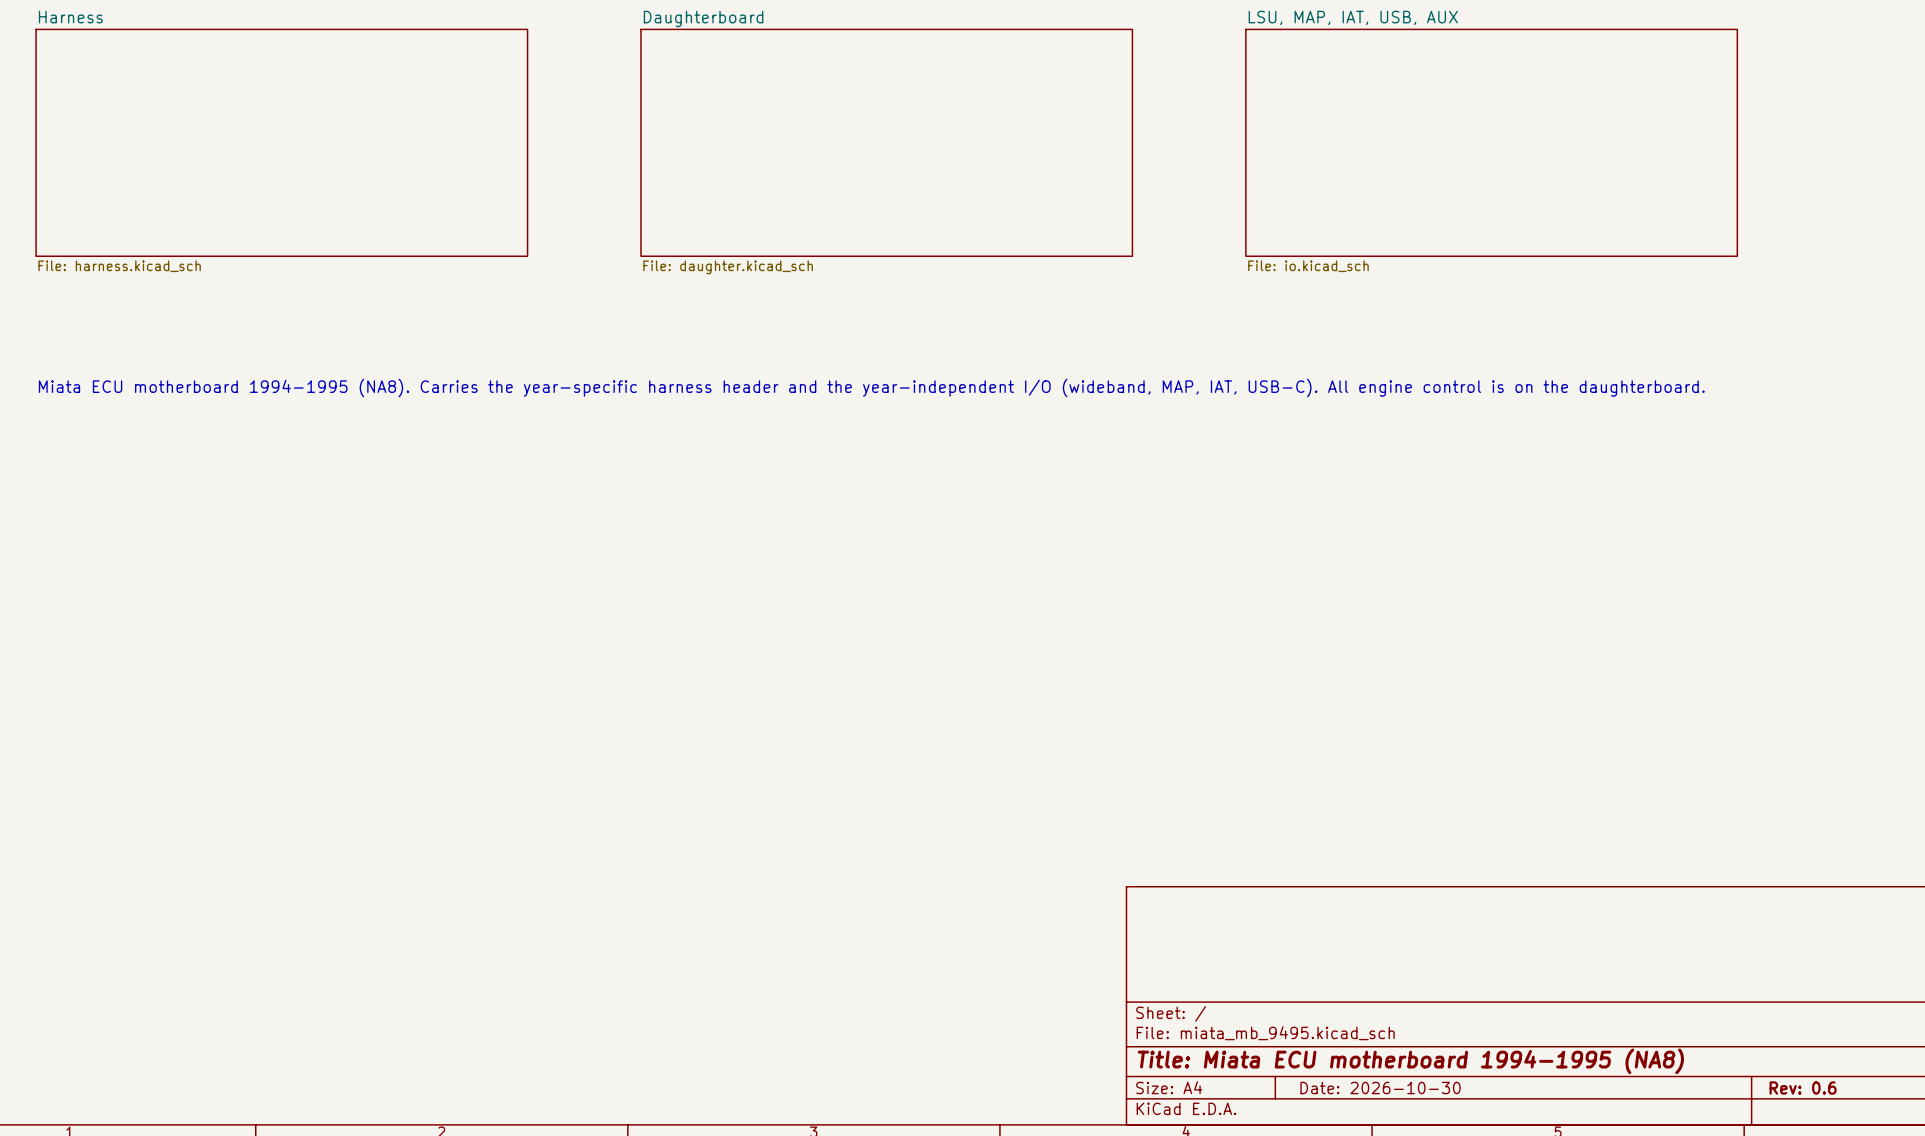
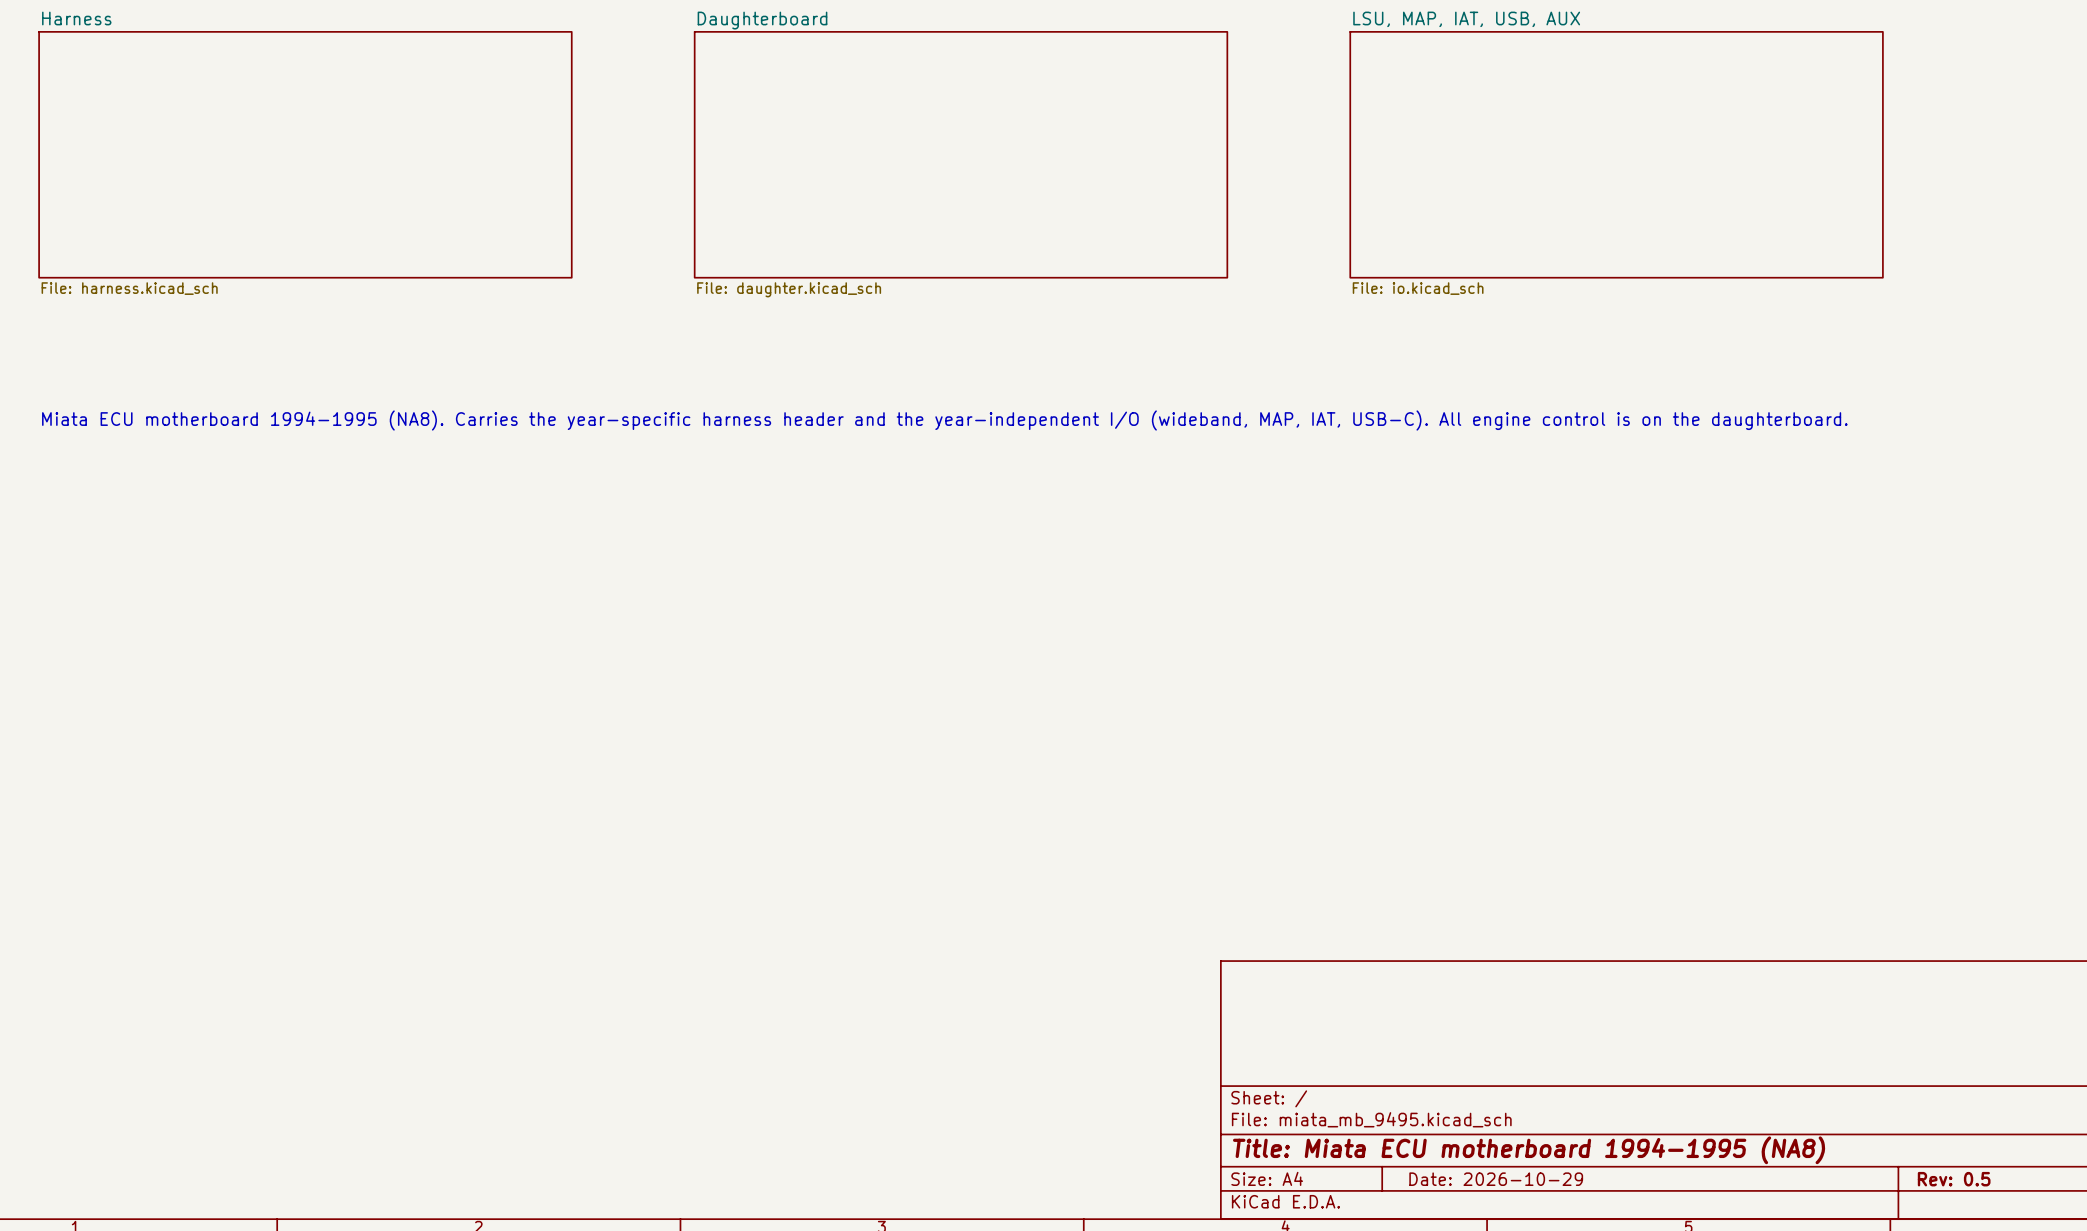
title block: Date: 2026-10-30 (1380, 1088) -> Date: 2026-10-29 (1496, 1179)
title block: Rev: 0.6 (1803, 1088) -> Rev: 0.5 (1954, 1179)

